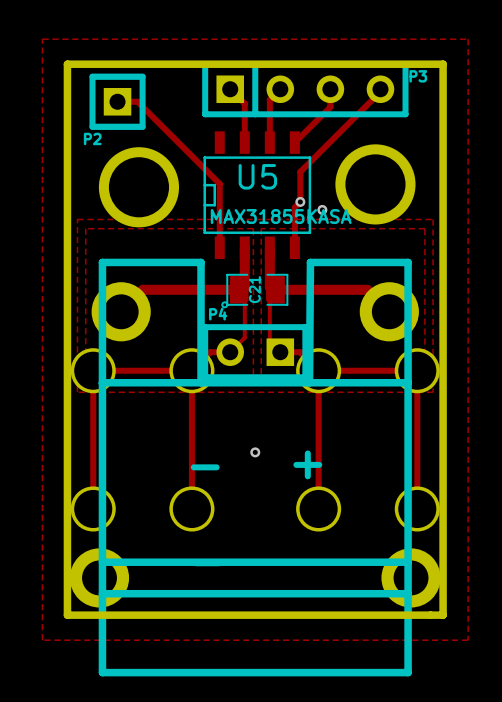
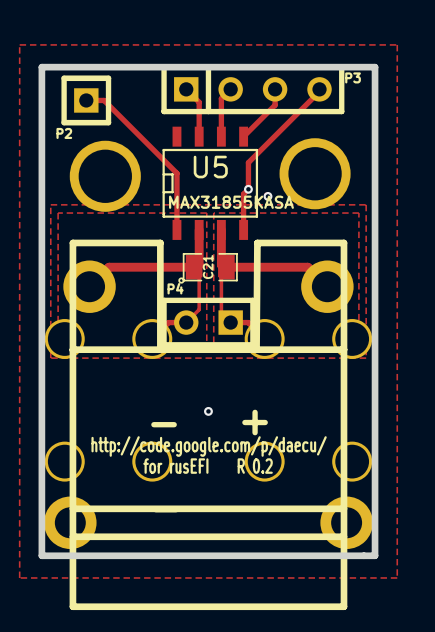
text: none -> http://code.google.com/p/daecu/ (209, 446)
track: (93, 508) (93, 370) (191, 370) (191, 508) -> none
track: (318, 508) (318, 370) (417, 370) (417, 508) -> none
text: none -> for rusEFI R 0.2 (208, 466)

